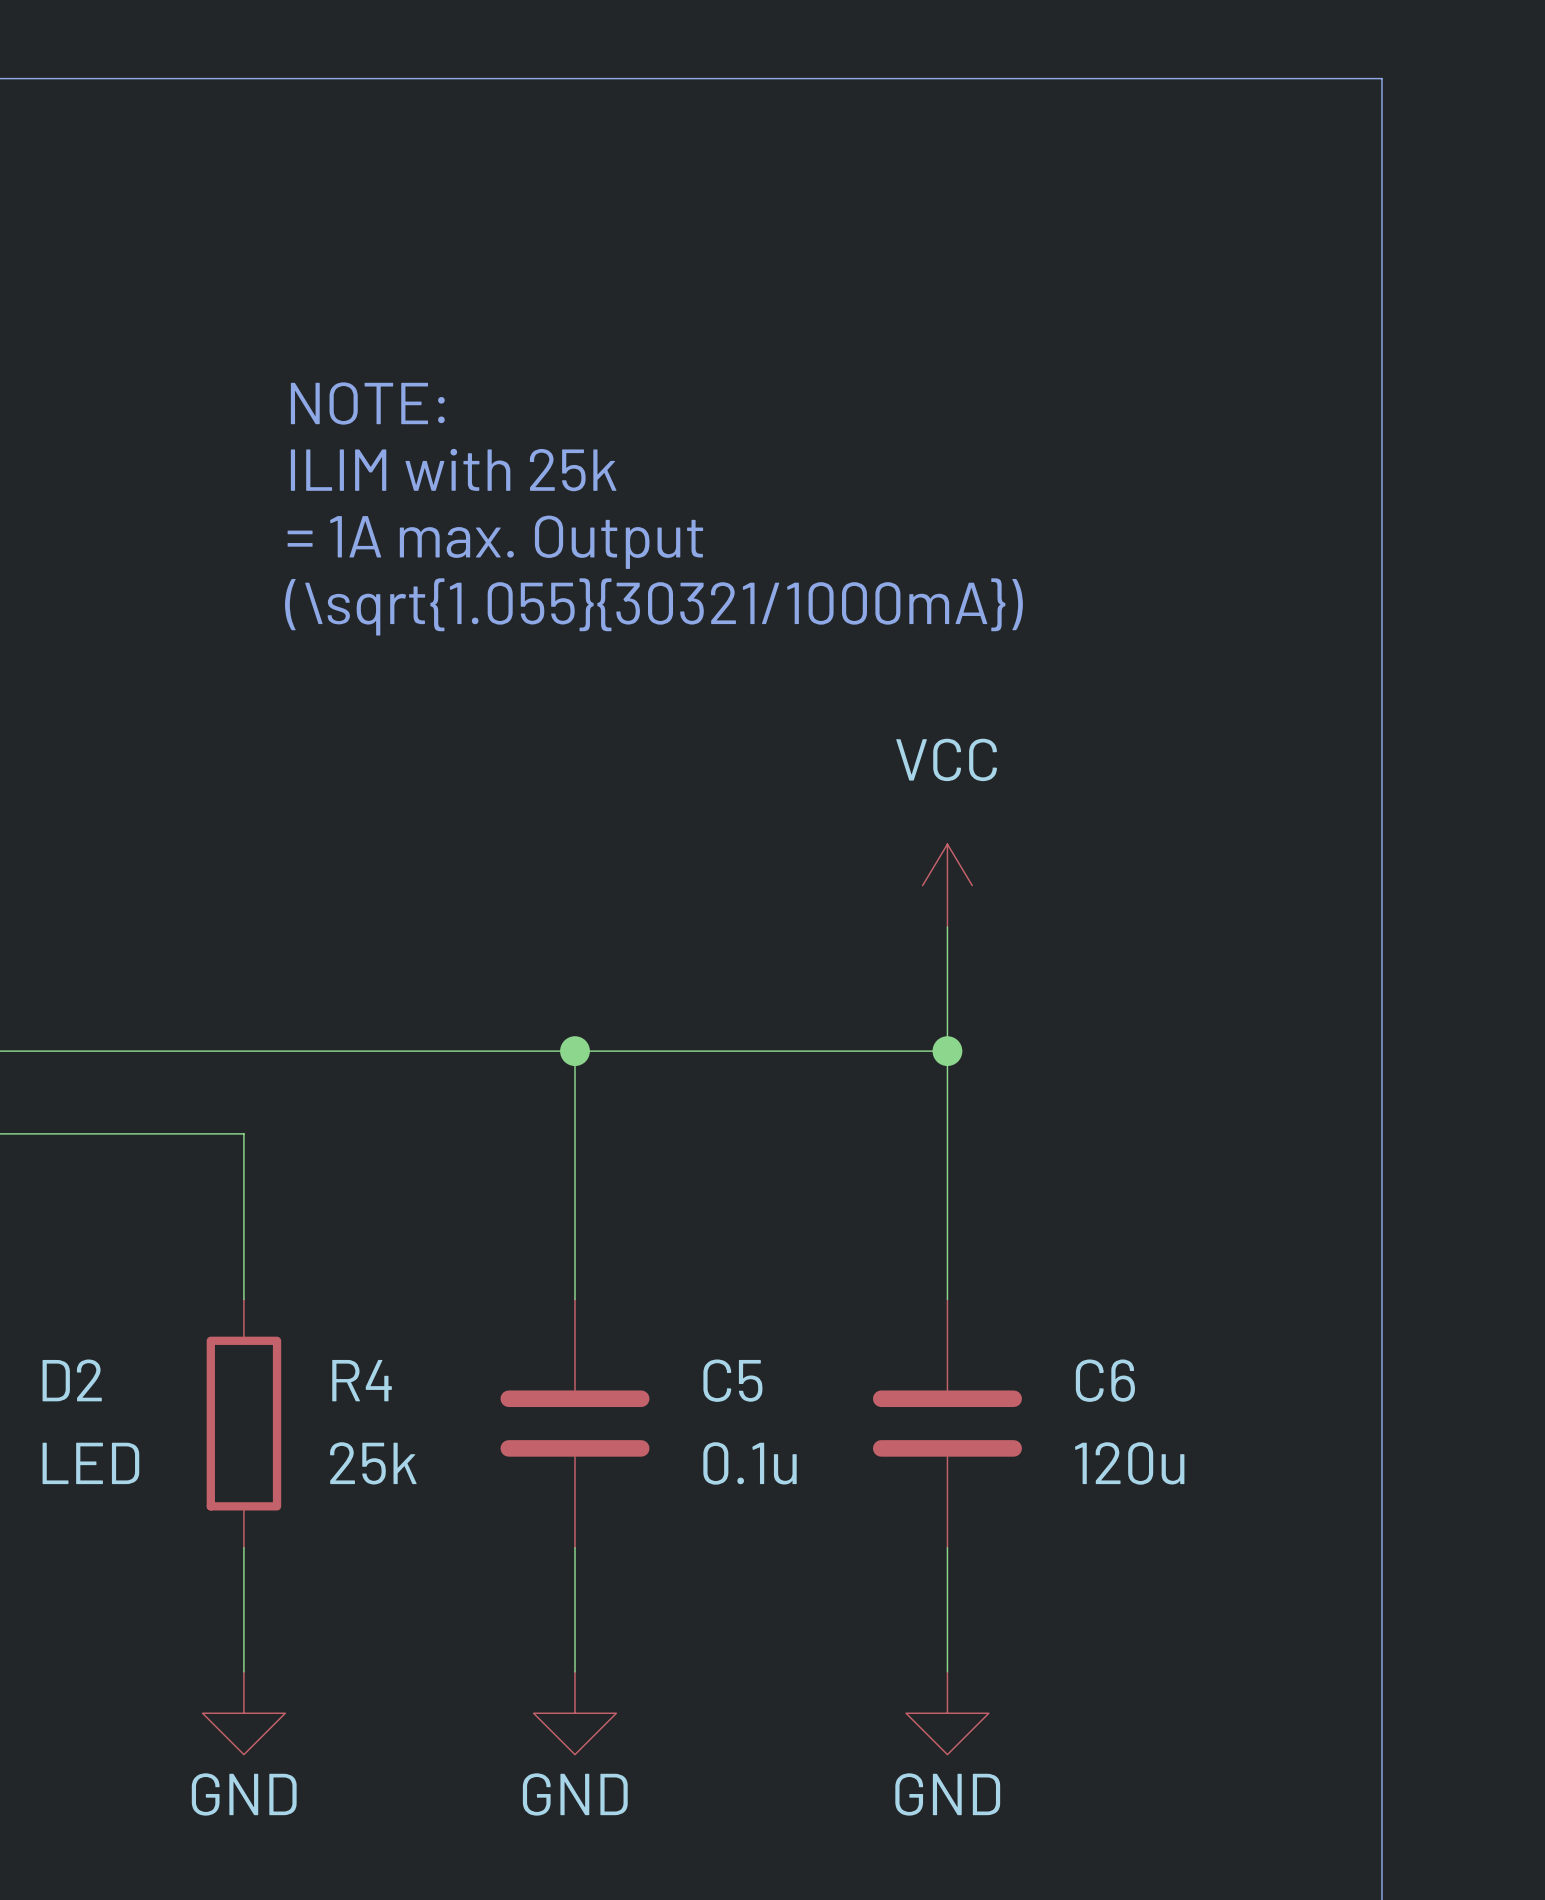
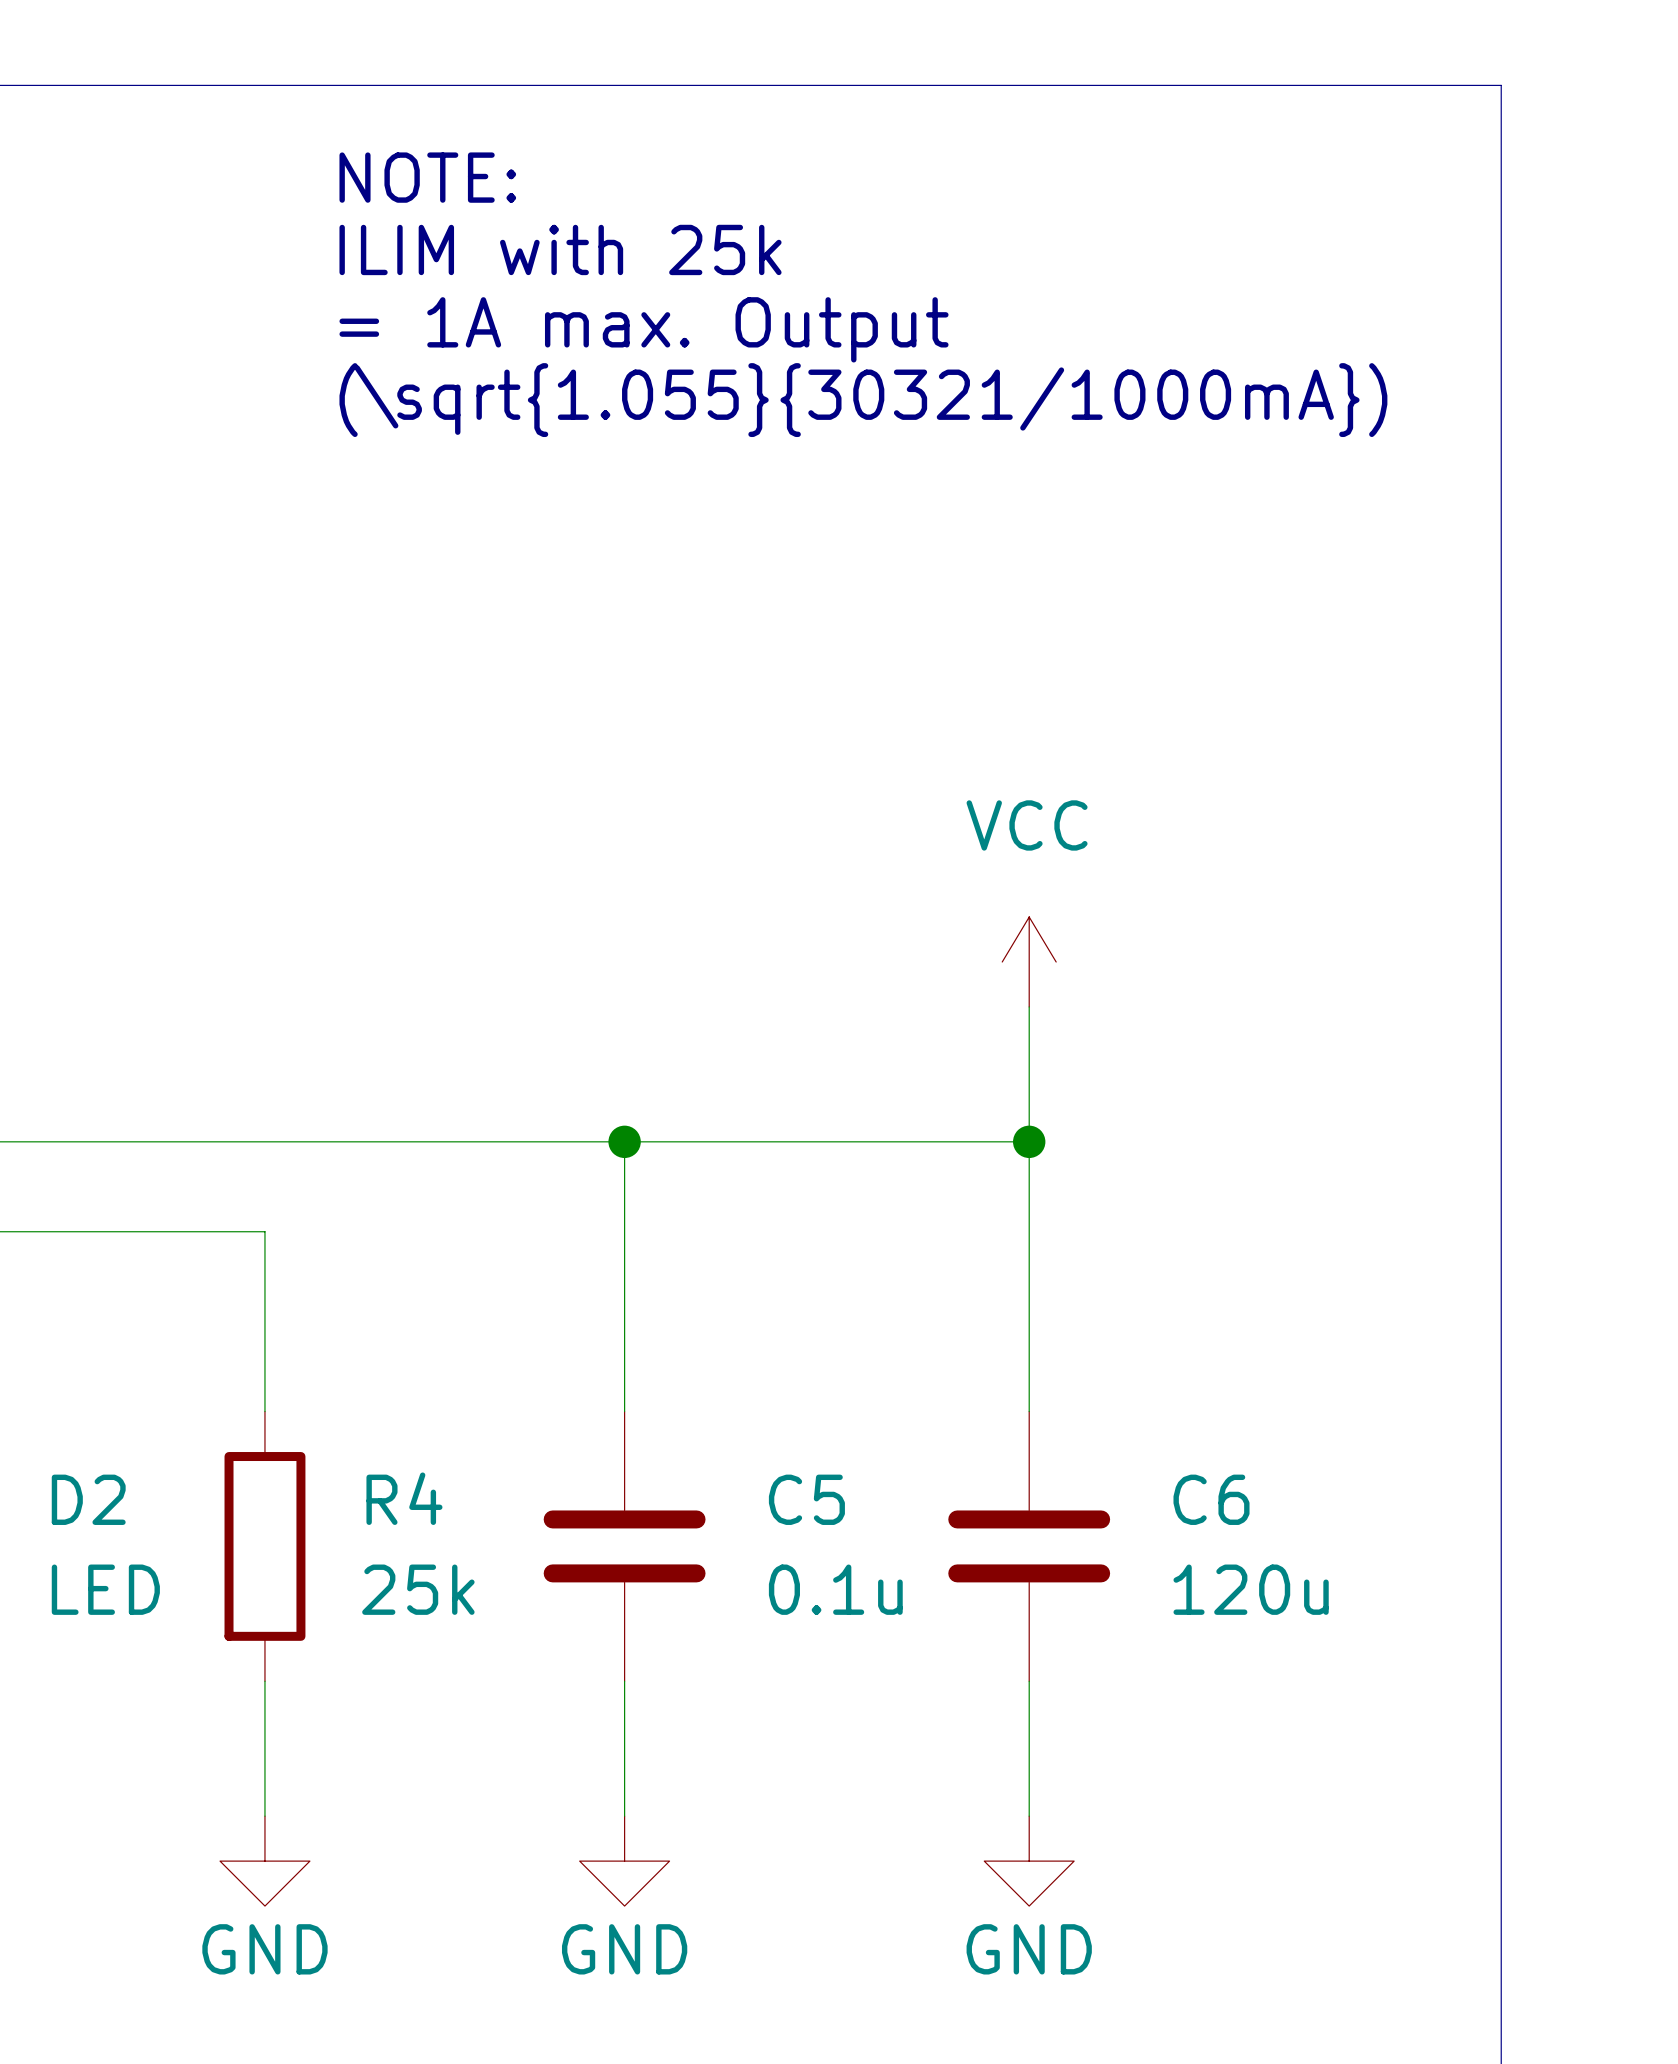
text position: NOTE: (367, 403) -> NOTE: (427, 177)
text position: ILIM with 25k (453, 470) -> ILIM with 25k (560, 249)
text position: = 1A max. Output (495, 542) -> = 1A max. Output (644, 329)
text position: (\sqrt{1.055}{30321/1000mA}) (653, 606) -> (\sqrt{1.055}{30321/1000mA}) (863, 400)

